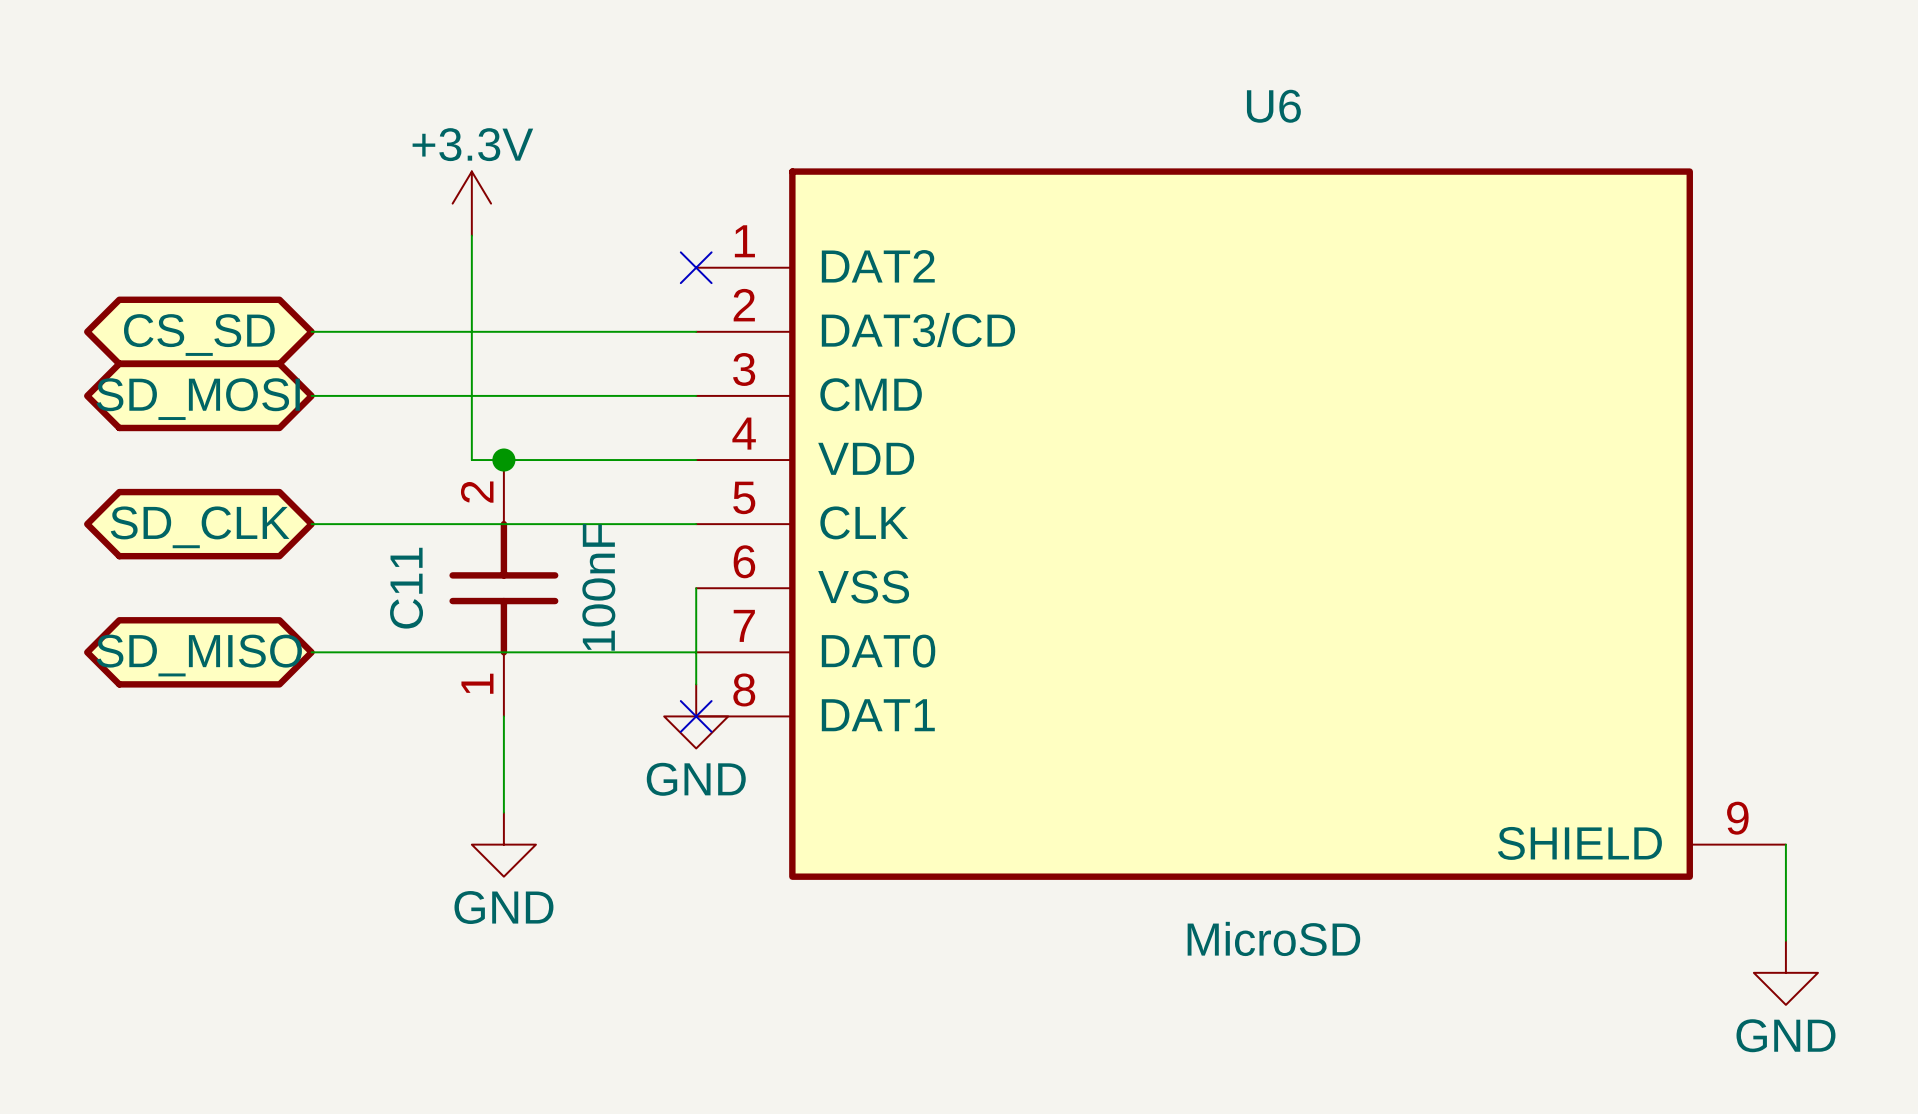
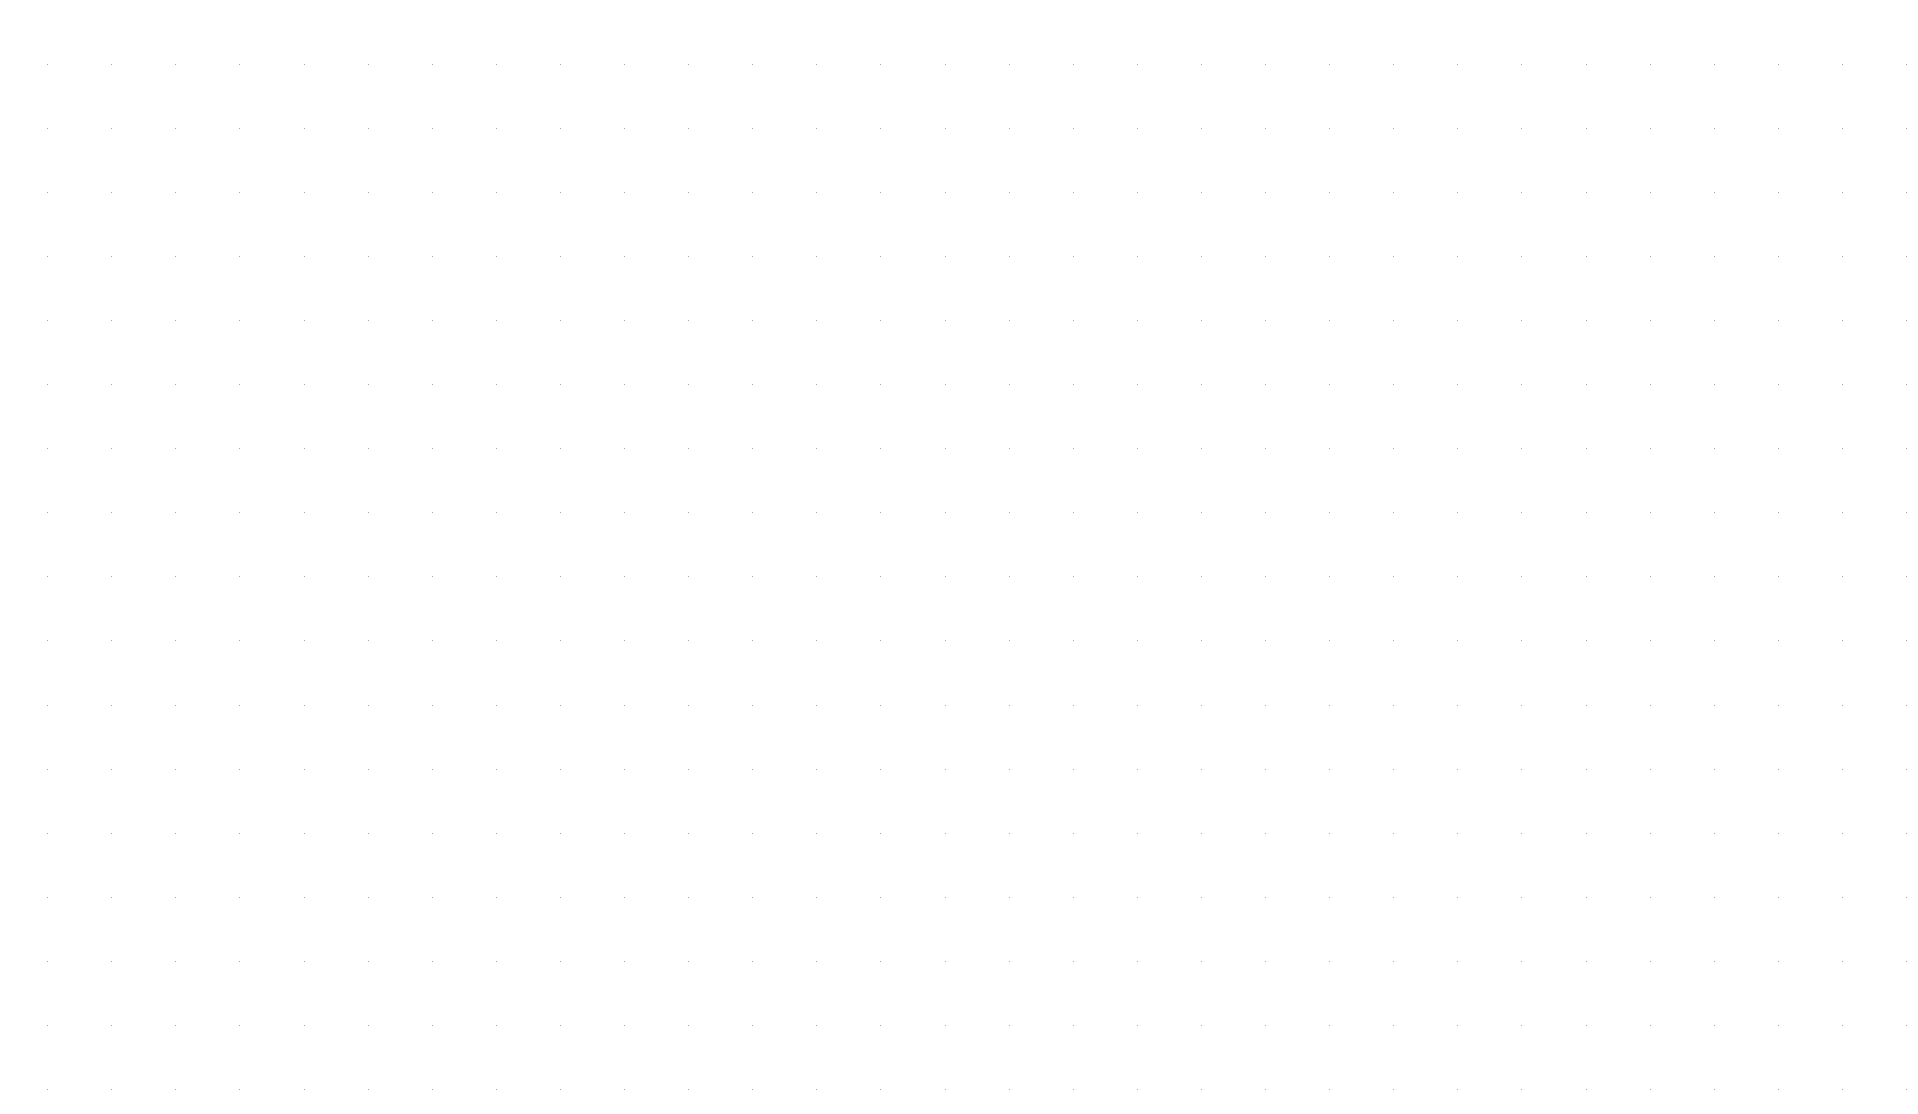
power symbol: +3.3V (471, 203) -> none
wire: (471, 235) (471, 460) (696, 460) -> none
no-connect mark: (696, 267) -> none
power symbol: CS_SD (199, 331) -> none
wire: (311, 331) (696, 331) -> none
power symbol: SD_MOSI (199, 395) -> none
wire: (311, 395) (696, 395) -> none
junction: (503, 460) -> none
power symbol: SD_CLK (199, 524) -> none
wire: (311, 524) (696, 524) -> none
U6: MicroSD (1241, 524) -> none
C11: 100nF (503, 588) -> none
wire: (696, 588) (696, 684) -> none
power symbol: SD_MISO (199, 652) -> none
wire: (311, 652) (696, 652) -> none
wire: (503, 716) (503, 812) -> none
no-connect mark: (696, 716) -> none
power symbol: GND (696, 716) -> none
power symbol: GND (503, 844) -> none
wire: (1785, 844) (1785, 940) -> none
power symbol: GND (1785, 972) -> none

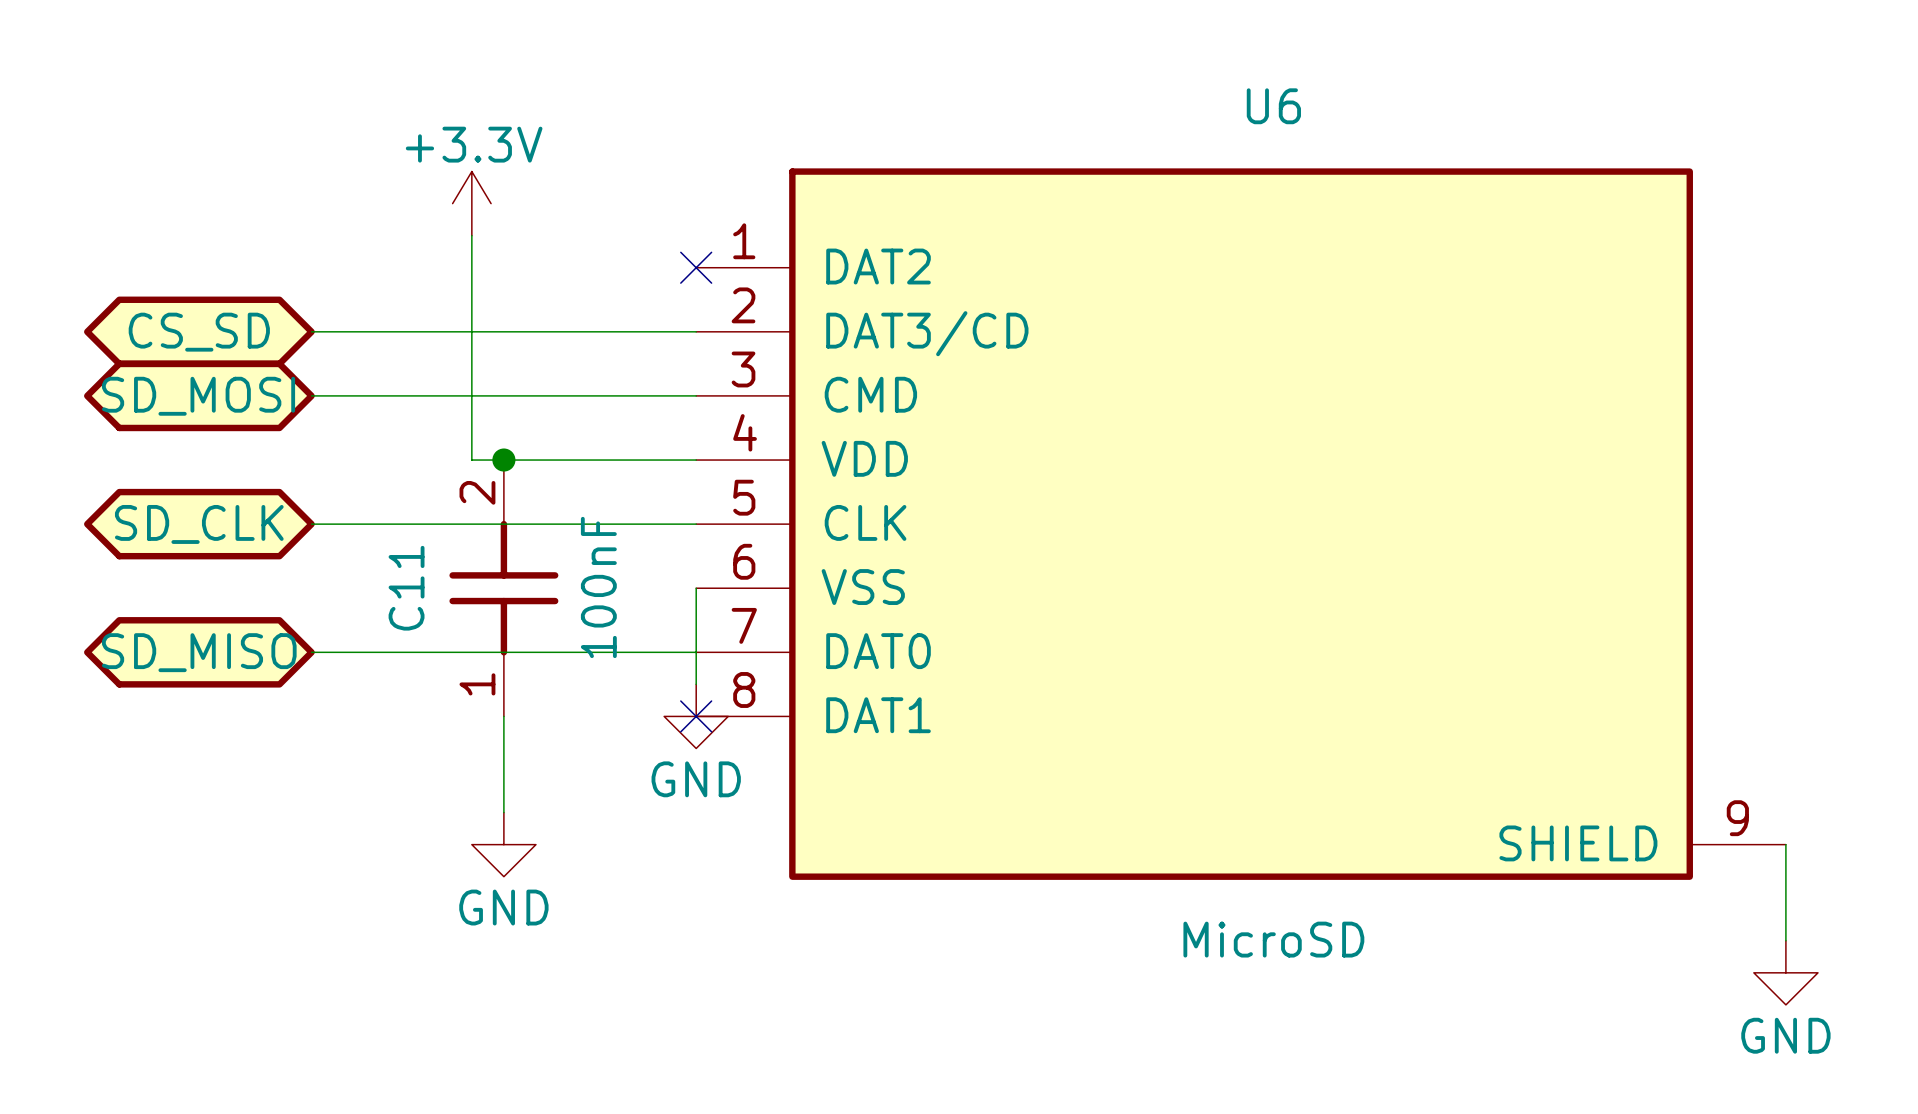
power symbol: none -> +3.3V (471, 203)
wire: none -> (471, 235) (471, 460) (696, 460)
no-connect mark: none -> (696, 267)
power symbol: none -> CS_SD (199, 331)
wire: none -> (311, 331) (696, 331)
power symbol: none -> SD_MOSI (199, 395)
wire: none -> (311, 395) (696, 395)
junction: none -> (503, 460)
power symbol: none -> SD_CLK (199, 524)
wire: none -> (311, 524) (696, 524)
U6: none -> MicroSD (1241, 524)
C11: none -> 100nF (503, 588)
wire: none -> (696, 588) (696, 684)
power symbol: none -> SD_MISO (199, 652)
wire: none -> (311, 652) (696, 652)
wire: none -> (503, 716) (503, 812)
no-connect mark: none -> (696, 716)
power symbol: none -> GND (696, 716)
power symbol: none -> GND (503, 844)
wire: none -> (1785, 844) (1785, 940)
power symbol: none -> GND (1785, 972)

